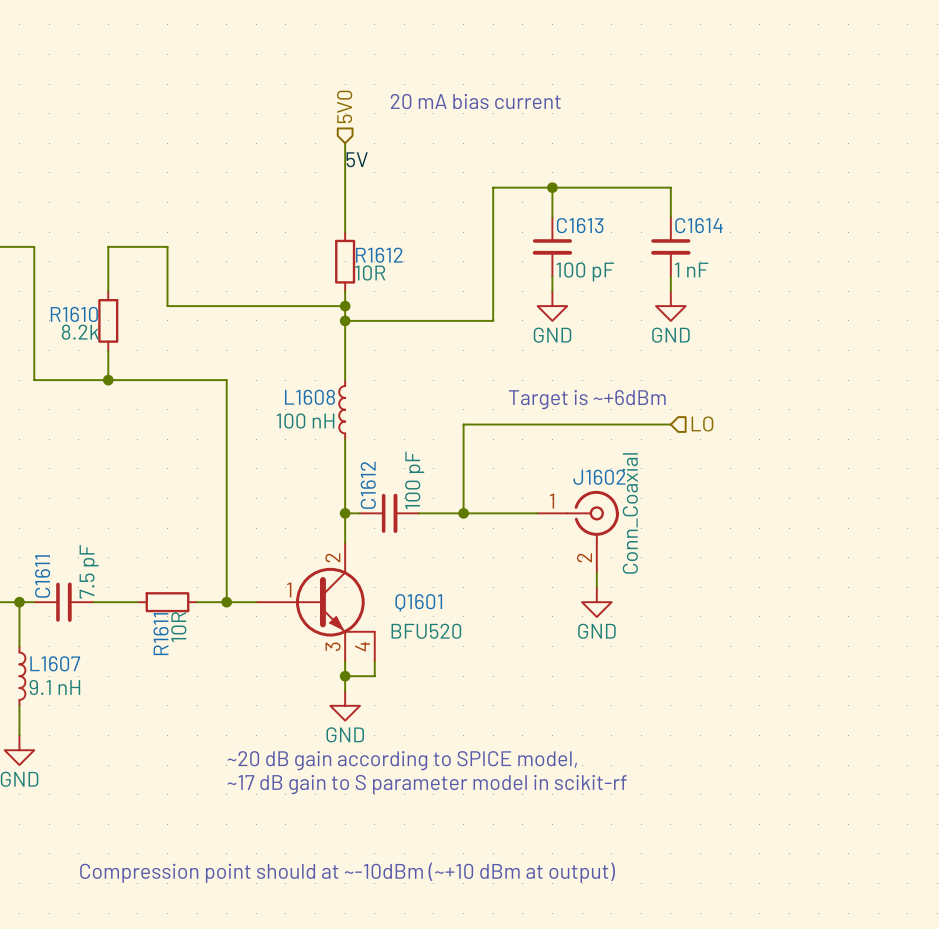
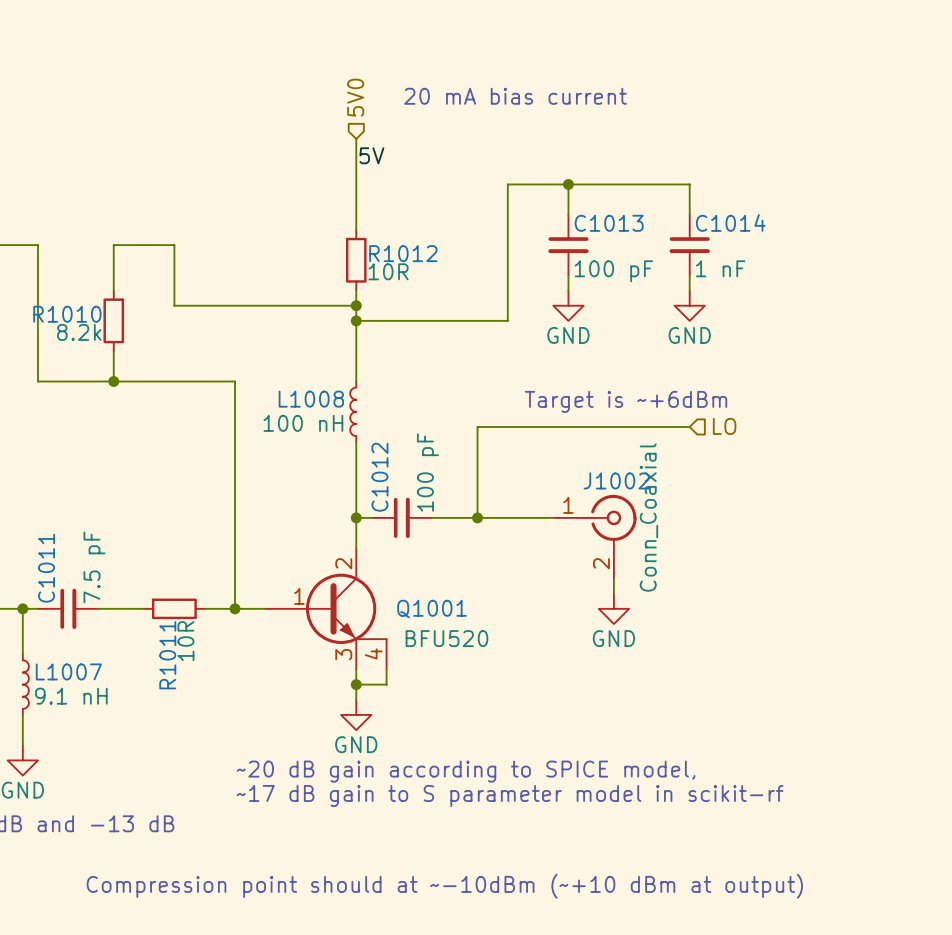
C1613 name: C1613 (580, 225) -> C1013 (609, 223)
C1614 name: C1614 (699, 225) -> C1014 (730, 222)
R1612 name: R1612 (379, 255) -> R1012 (403, 253)
R1610 name: R1610 (74, 314) -> R1010 (67, 314)
L1608 name: L1608 (309, 397) -> L1008 (311, 399)
J1602 name: J1602 (599, 477) -> J1002 (616, 480)
C1612 name: C1612 (368, 485) -> C1012 (379, 477)
C1611 name: C1611 (42, 576) -> C1011 (46, 568)
Q1601 name: Q1601 (418, 602) -> Q1001 (432, 609)
R1611 name: R1611 (161, 634) -> R1011 (167, 655)
L1607 name: L1607 (55, 663) -> L1007 (68, 671)

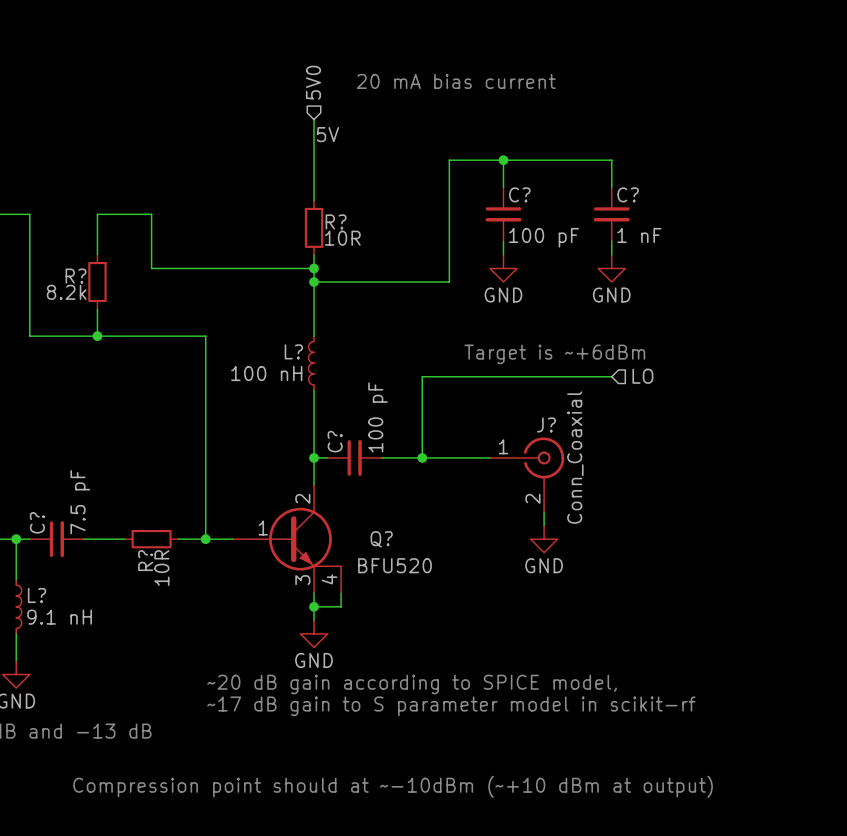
C1014 name: C1014 (730, 222) -> C? (628, 194)
C1013 name: C1013 (609, 223) -> C? (519, 194)
R1012 name: R1012 (403, 253) -> R? (336, 221)
R1010 name: R1010 (67, 314) -> R? (76, 276)
L1008 name: L1008 (311, 399) -> L? (293, 351)
C1012 name: C1012 (379, 477) -> C? (335, 441)
J1002 name: J1002 (616, 480) -> J? (546, 424)
C1011 name: C1011 (46, 568) -> C? (37, 522)
Q1001 name: Q1001 (432, 609) -> Q? (381, 539)
R1011 name: R1011 (167, 655) -> R? (145, 560)
L1007 name: L1007 (68, 671) -> L? (37, 595)

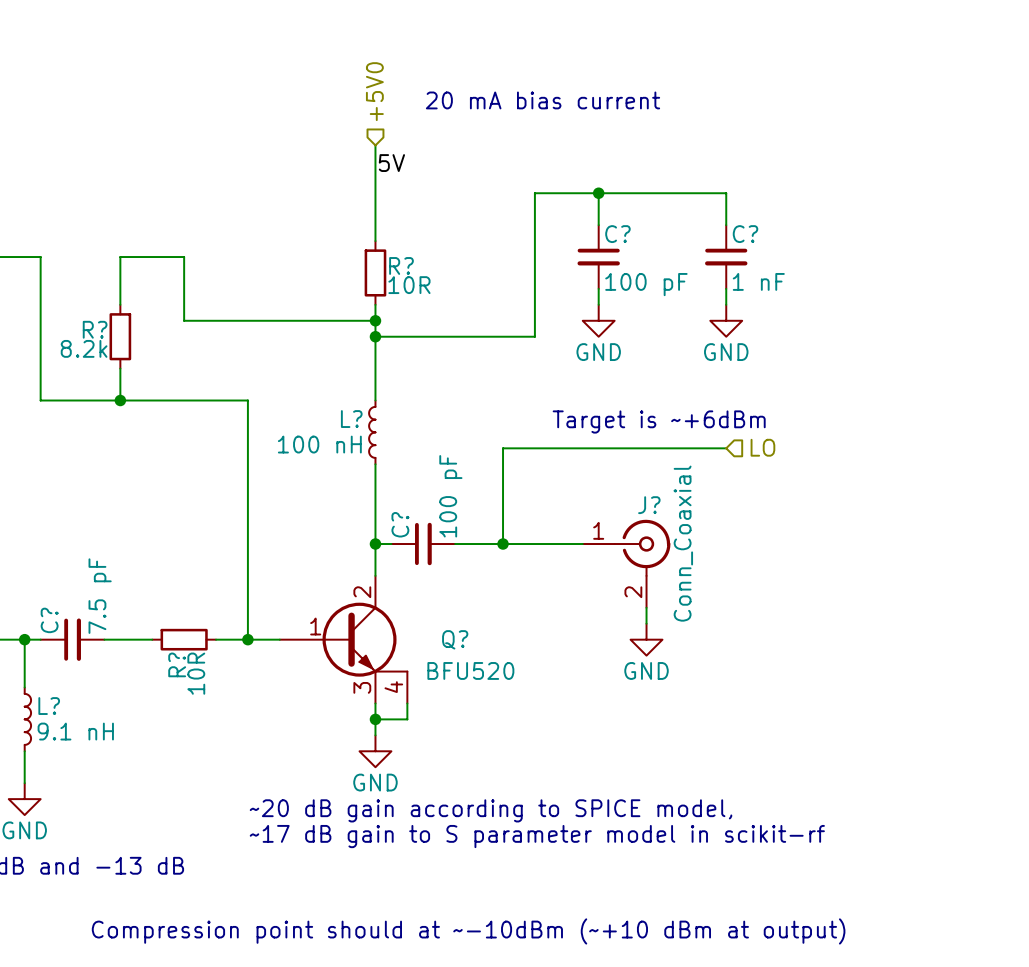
hierarchical label: 5V0 (313, 82) -> +5V0 (374, 91)

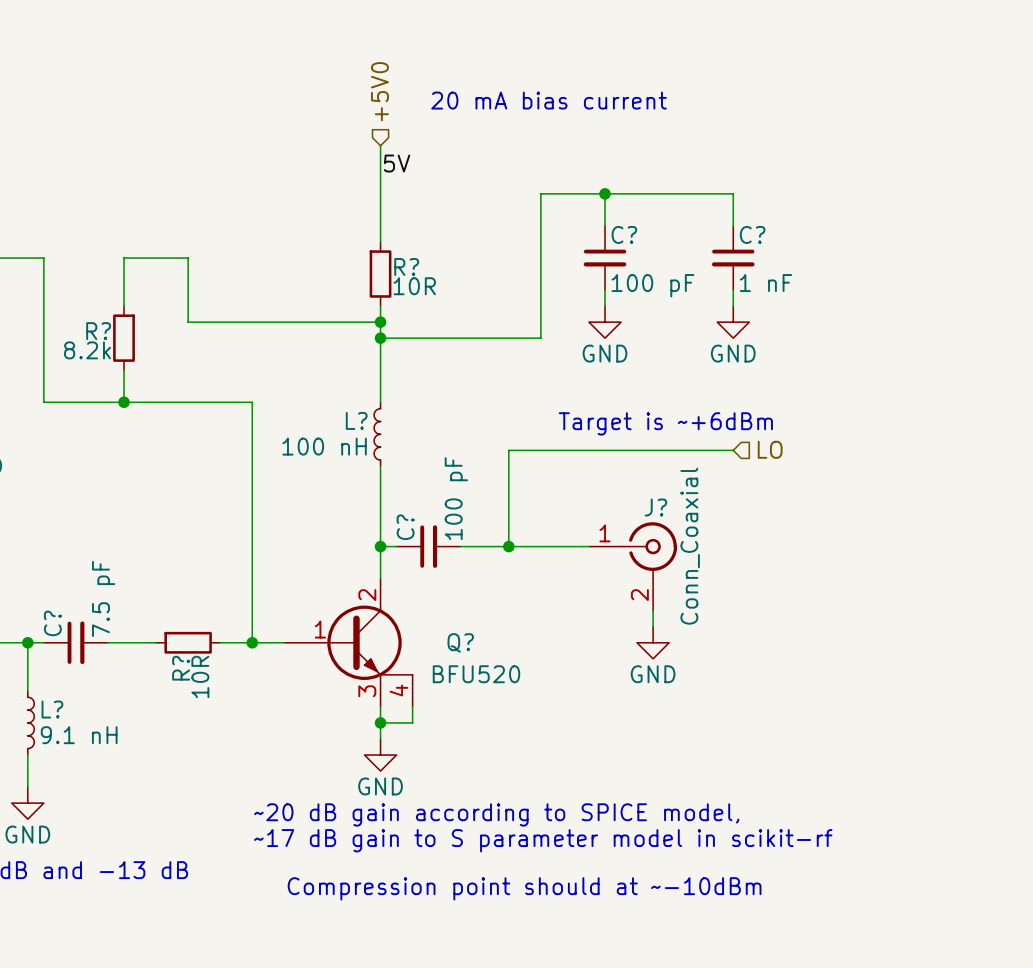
text: none -> Compression point should at ~-10dBm (524, 888)
text: Compression point should at ~-10dBm (~+10 dBm at output) (468, 931) -> none

